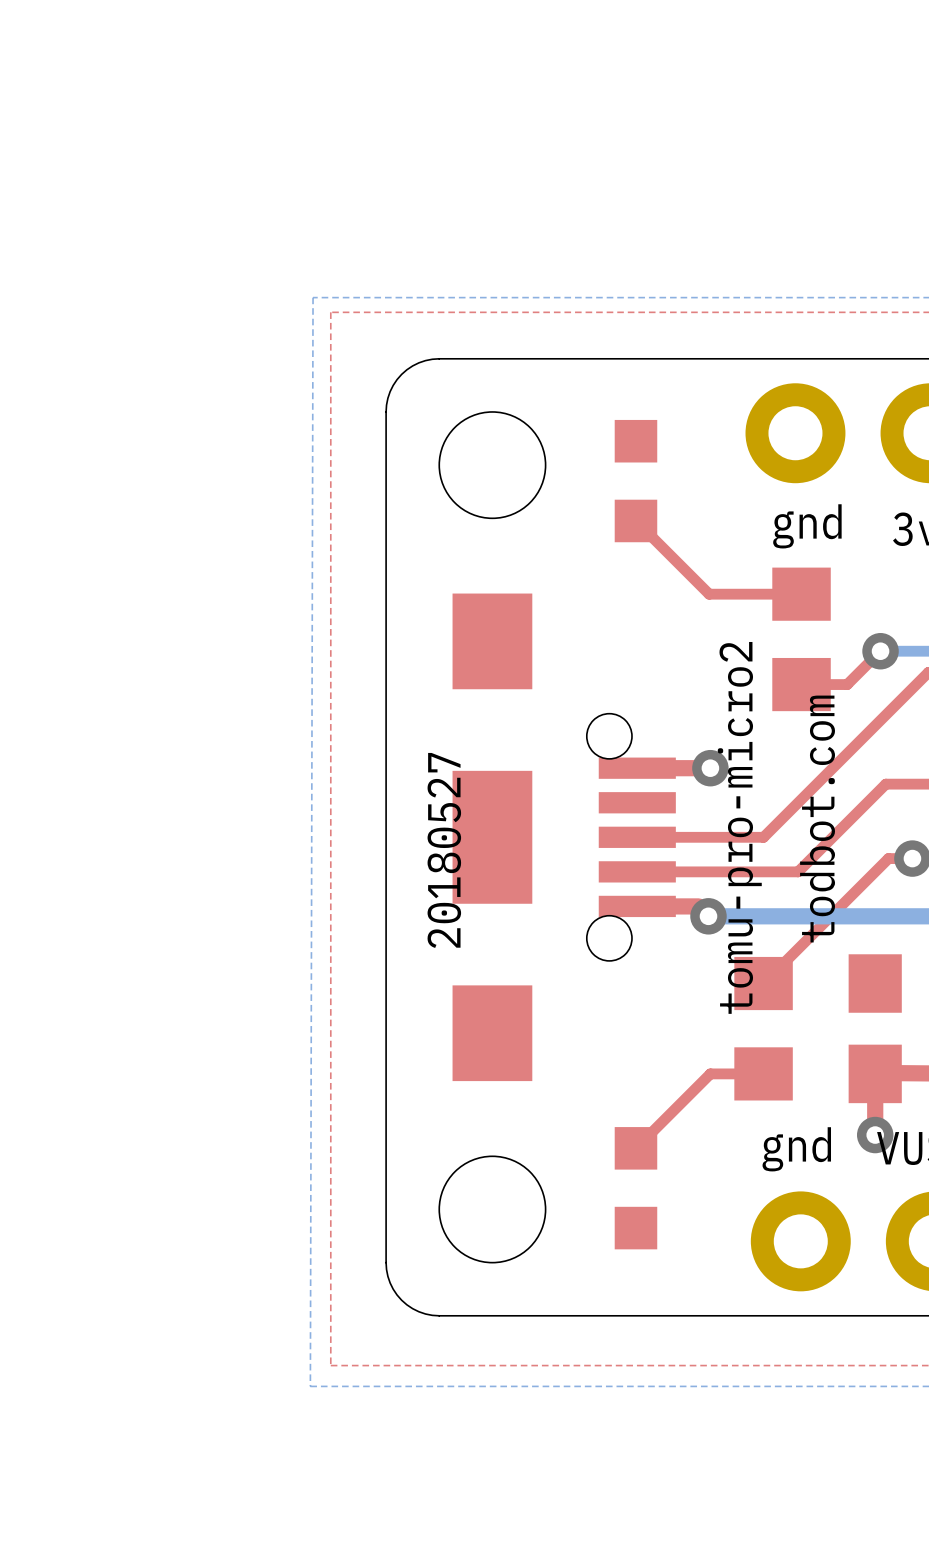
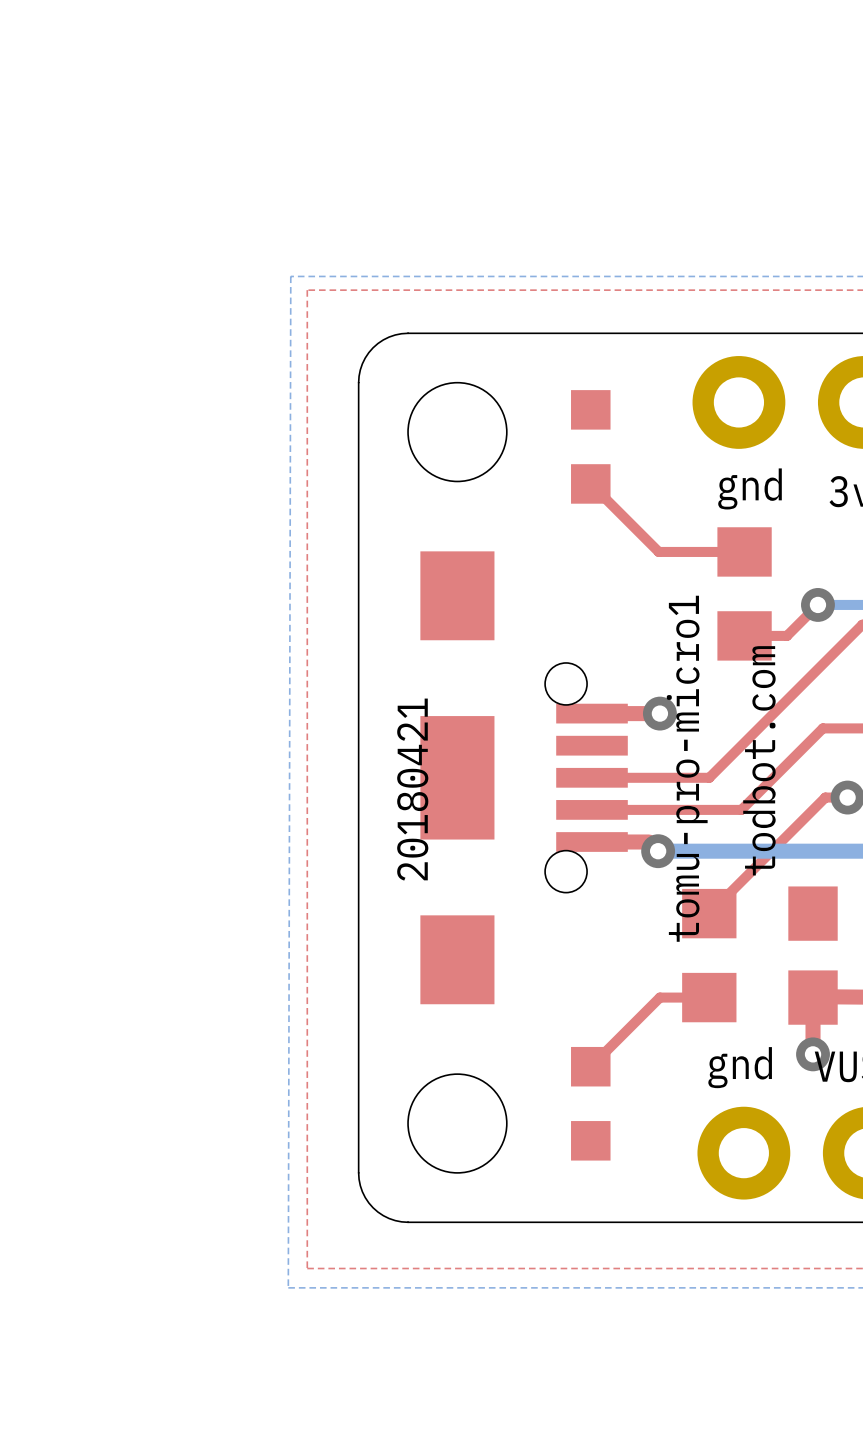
text: tomu-pro-micro2 (739, 827) -> tomu-pro-micro1 (687, 768)
text: 20180527 (444, 850) -> 20180421 (412, 789)

